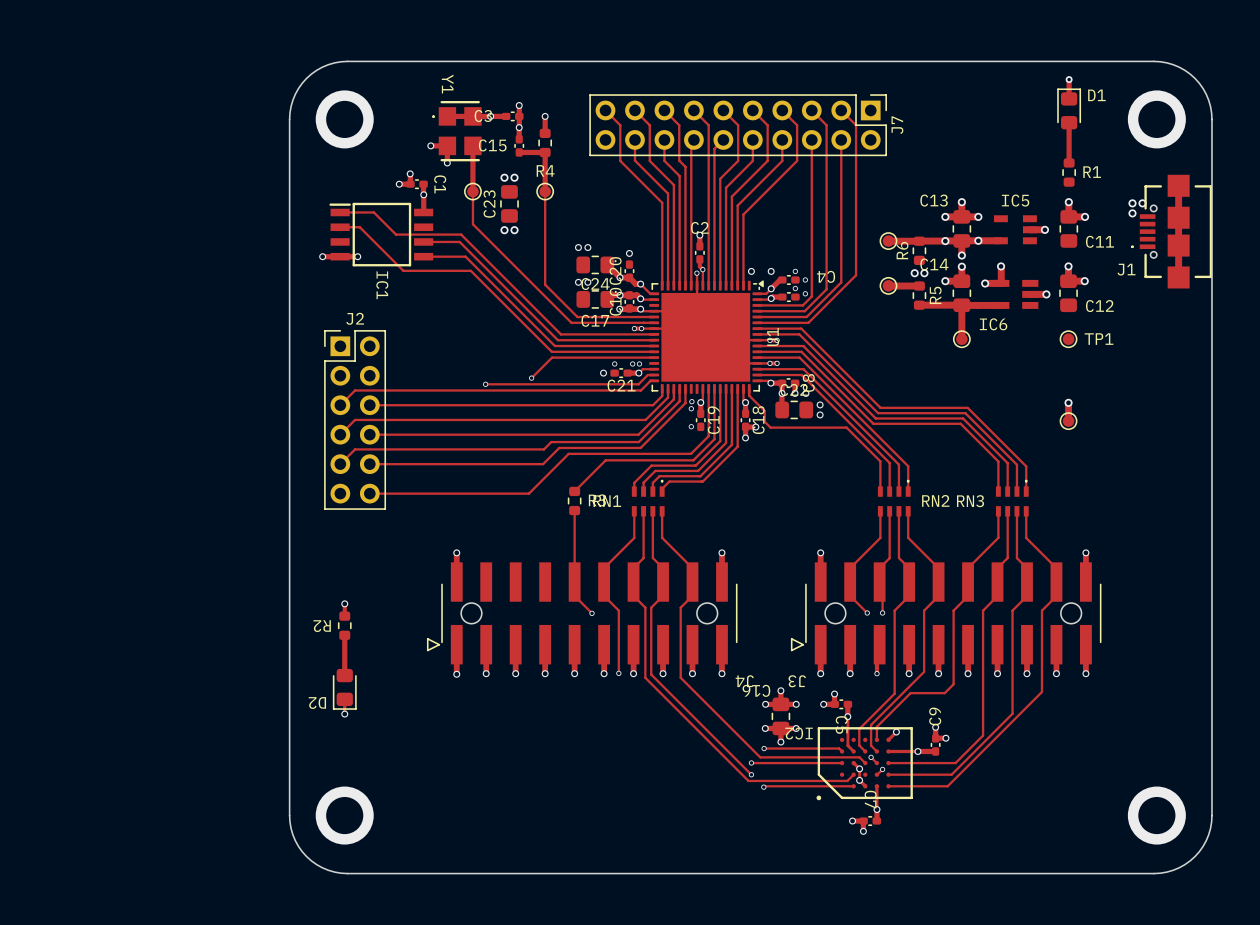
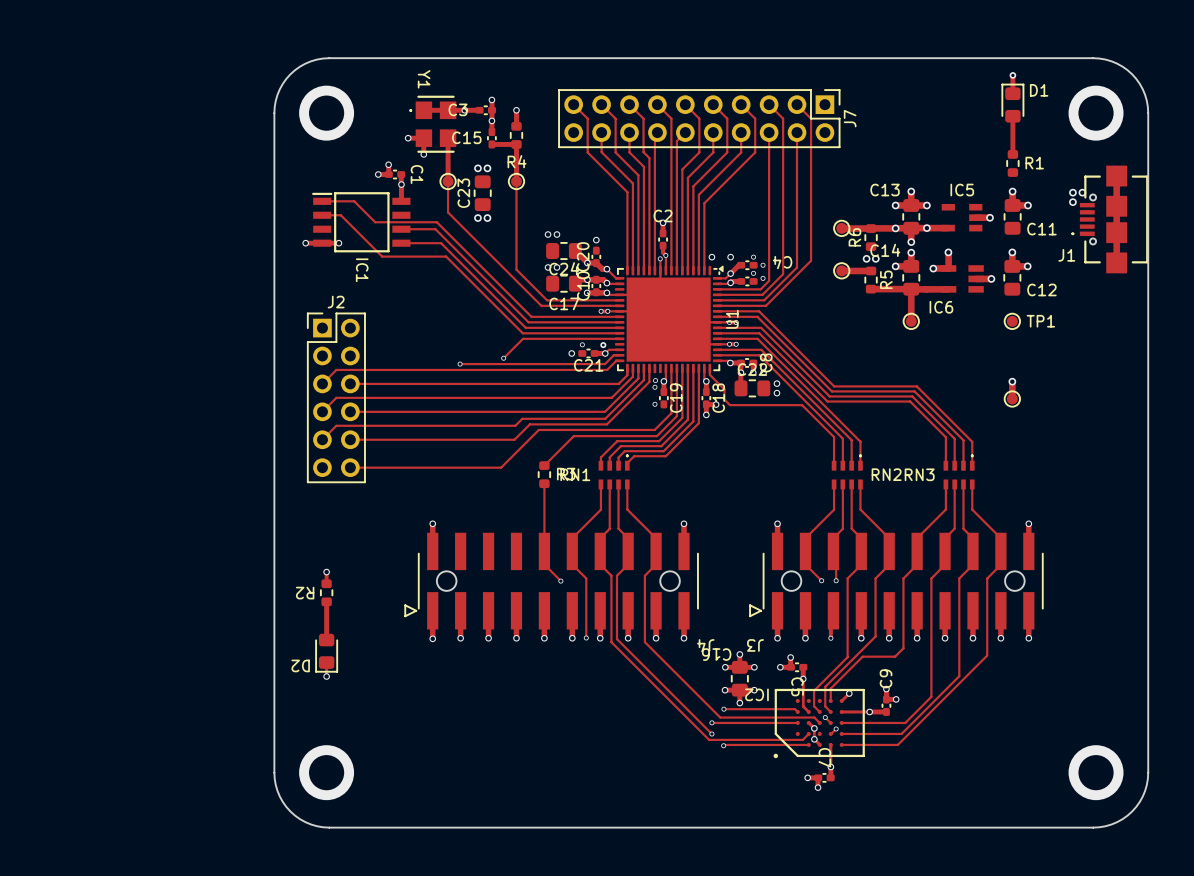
via: (632, 363) -> none
via: (639, 363) -> none
via: none -> (603, 345)

